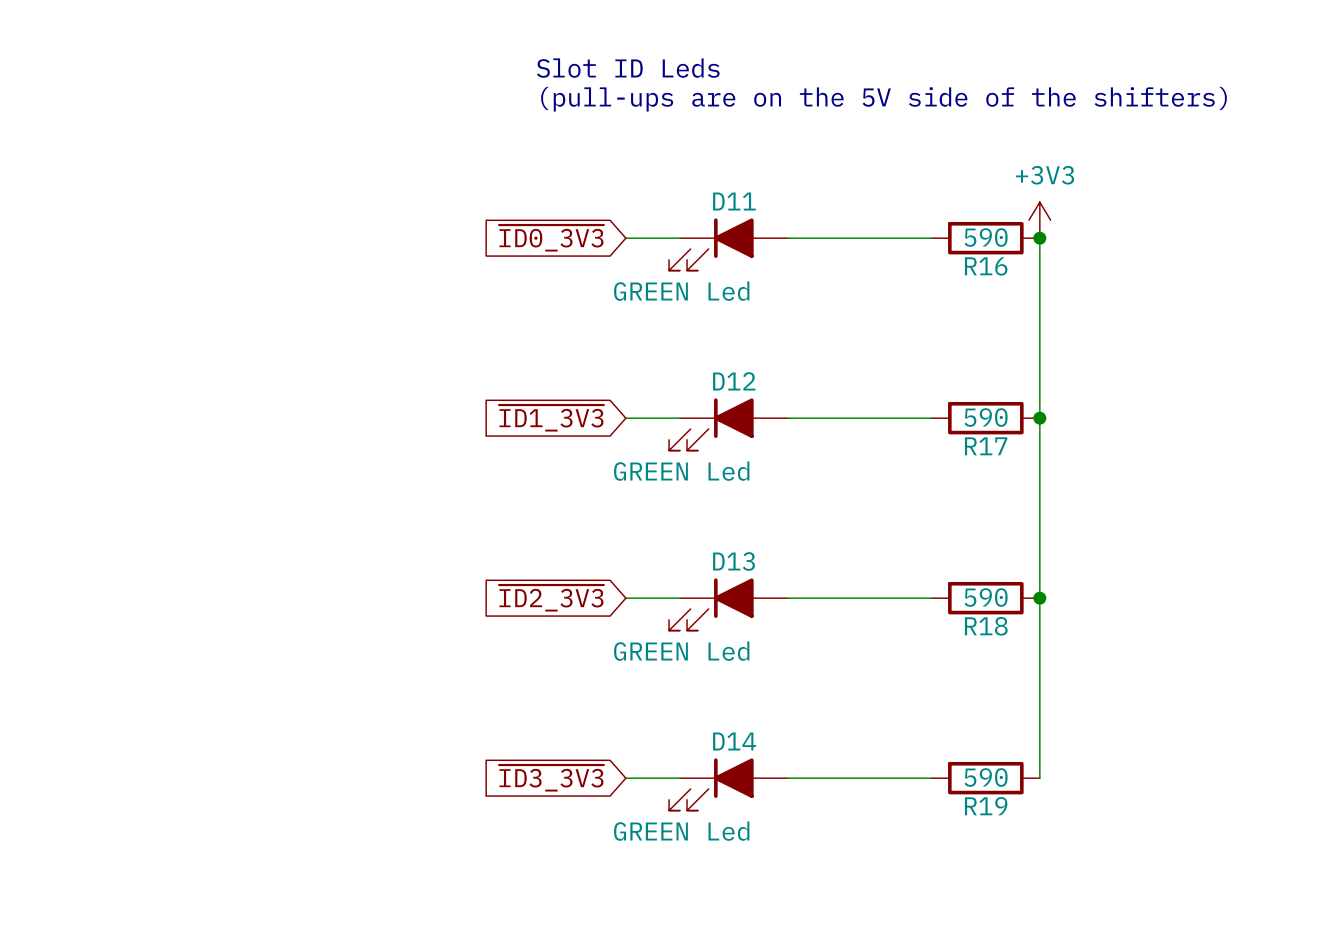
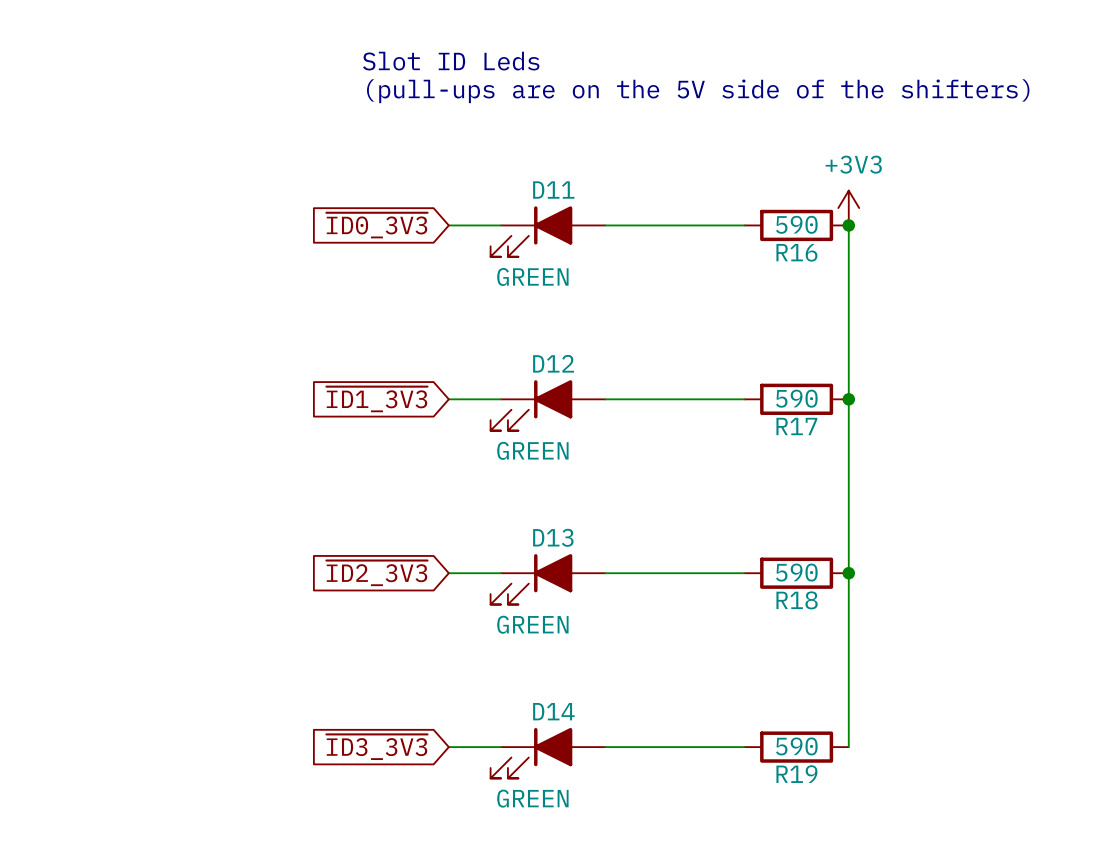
D11 value: GREEN Led (681, 291) -> GREEN (532, 276)
D12 value: GREEN Led (681, 471) -> GREEN (532, 450)
D13 value: GREEN Led (681, 651) -> GREEN (532, 624)
D14 value: GREEN Led (681, 831) -> GREEN (532, 798)

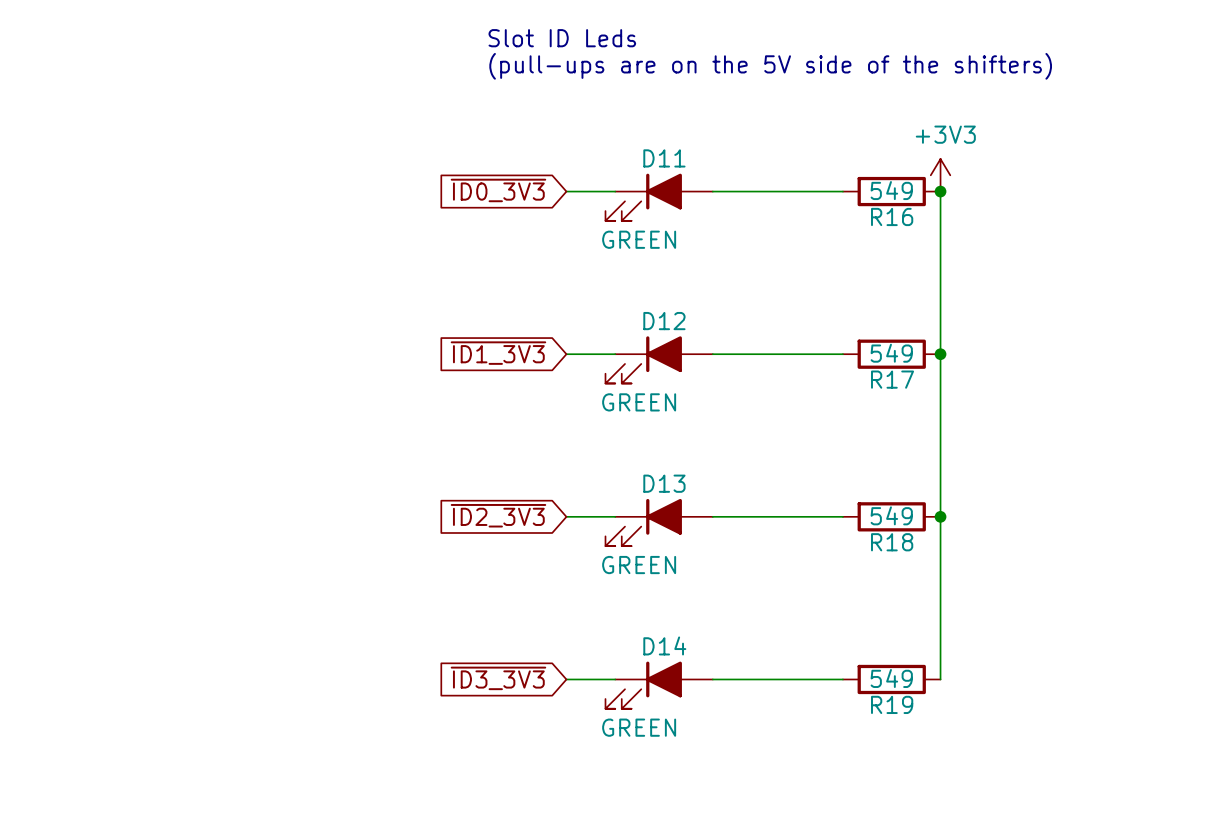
R16 value: 590 (796, 224) -> 549 (891, 190)
R17 value: 590 (796, 398) -> 549 (891, 353)
R18 value: 590 (796, 572) -> 549 (891, 515)
R19 value: 590 (796, 746) -> 549 (891, 678)

